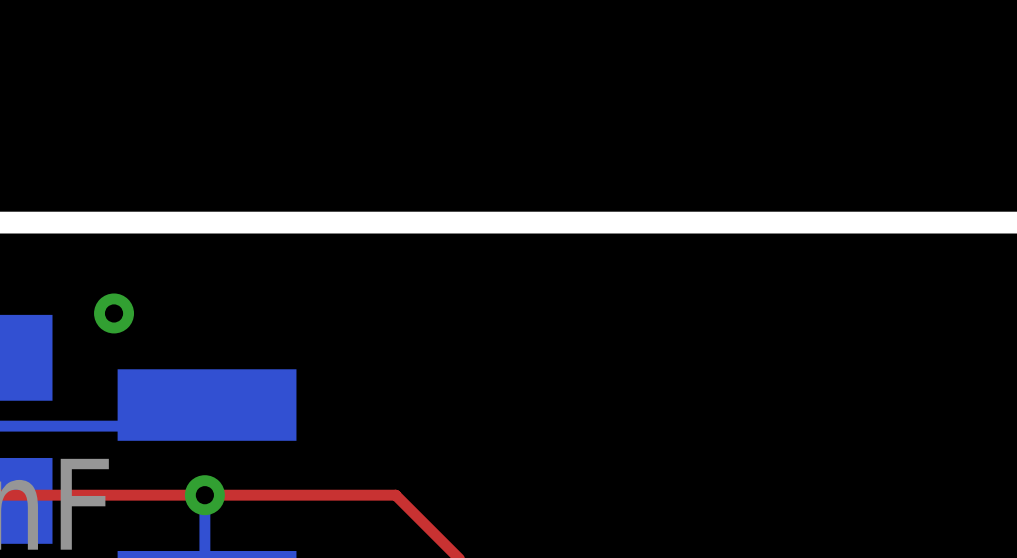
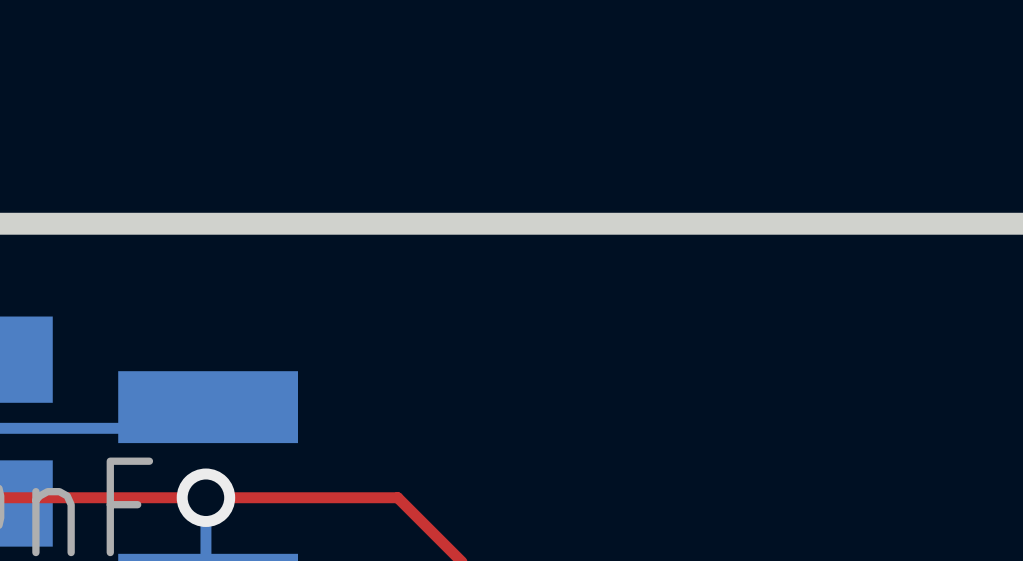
via: (114, 313) -> none
via size: [184, 475, 225, 516] -> [176, 468, 236, 527]

